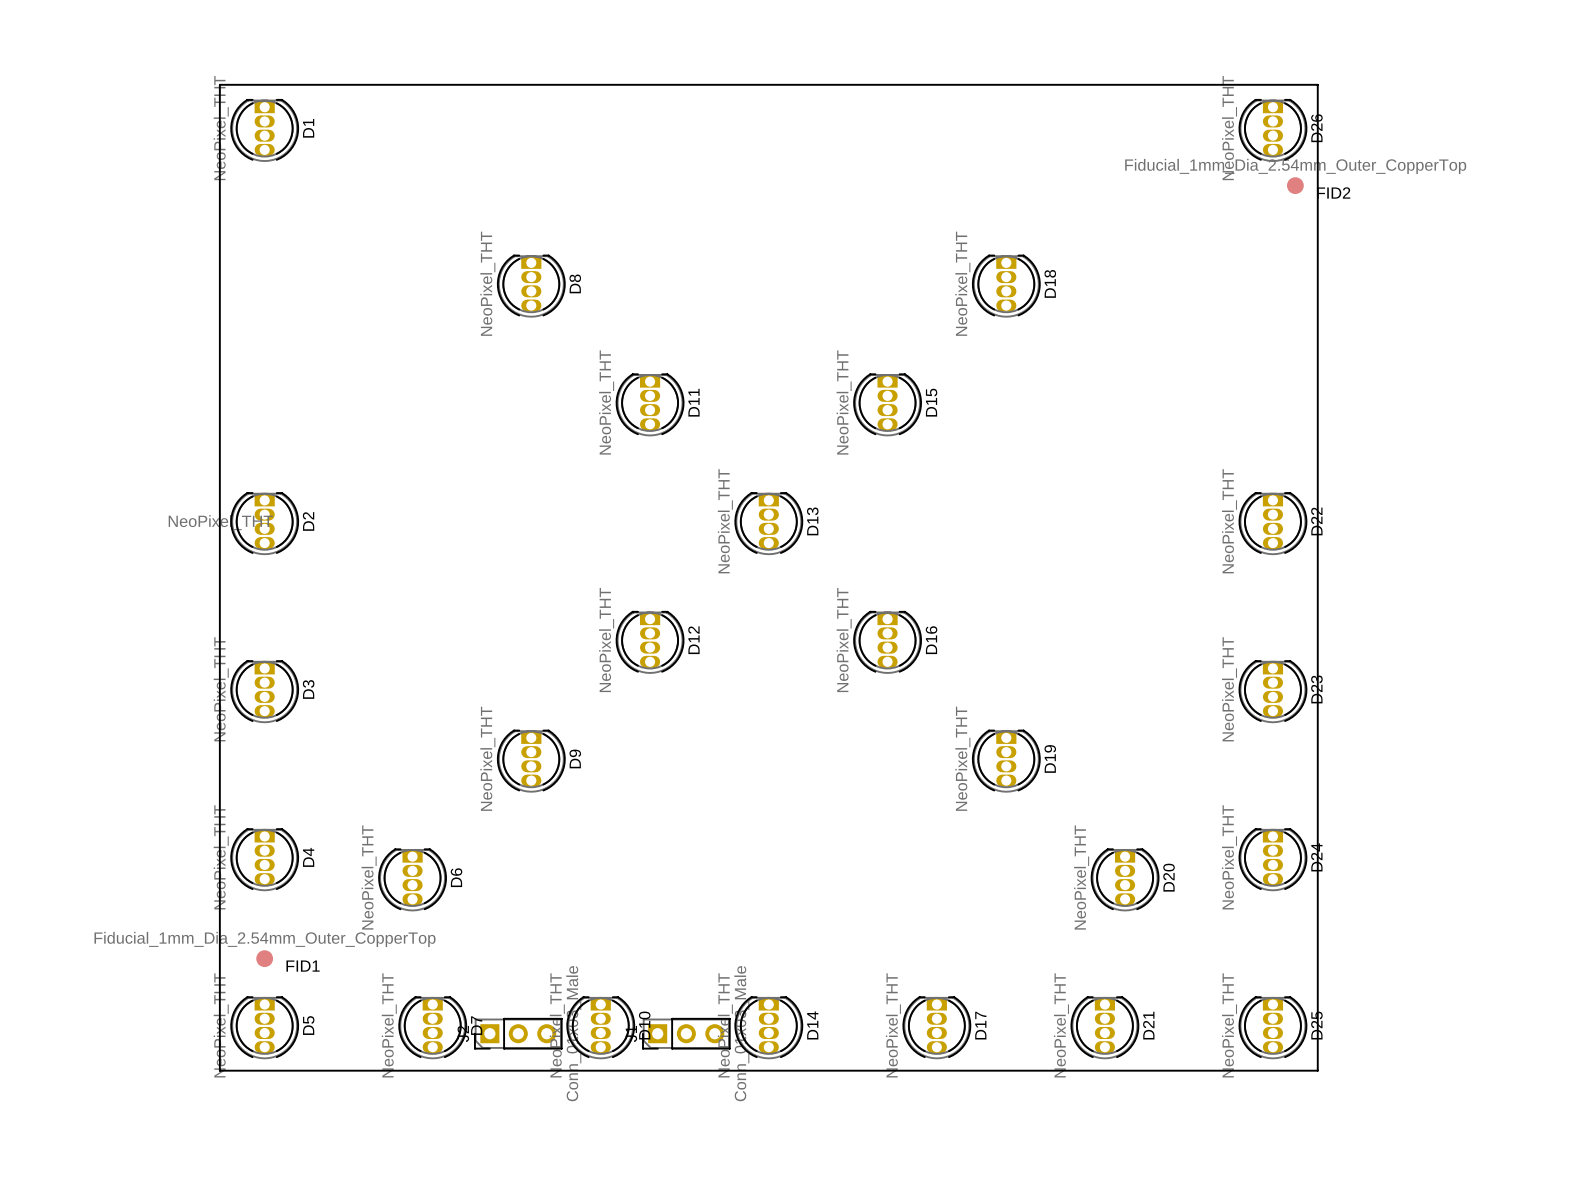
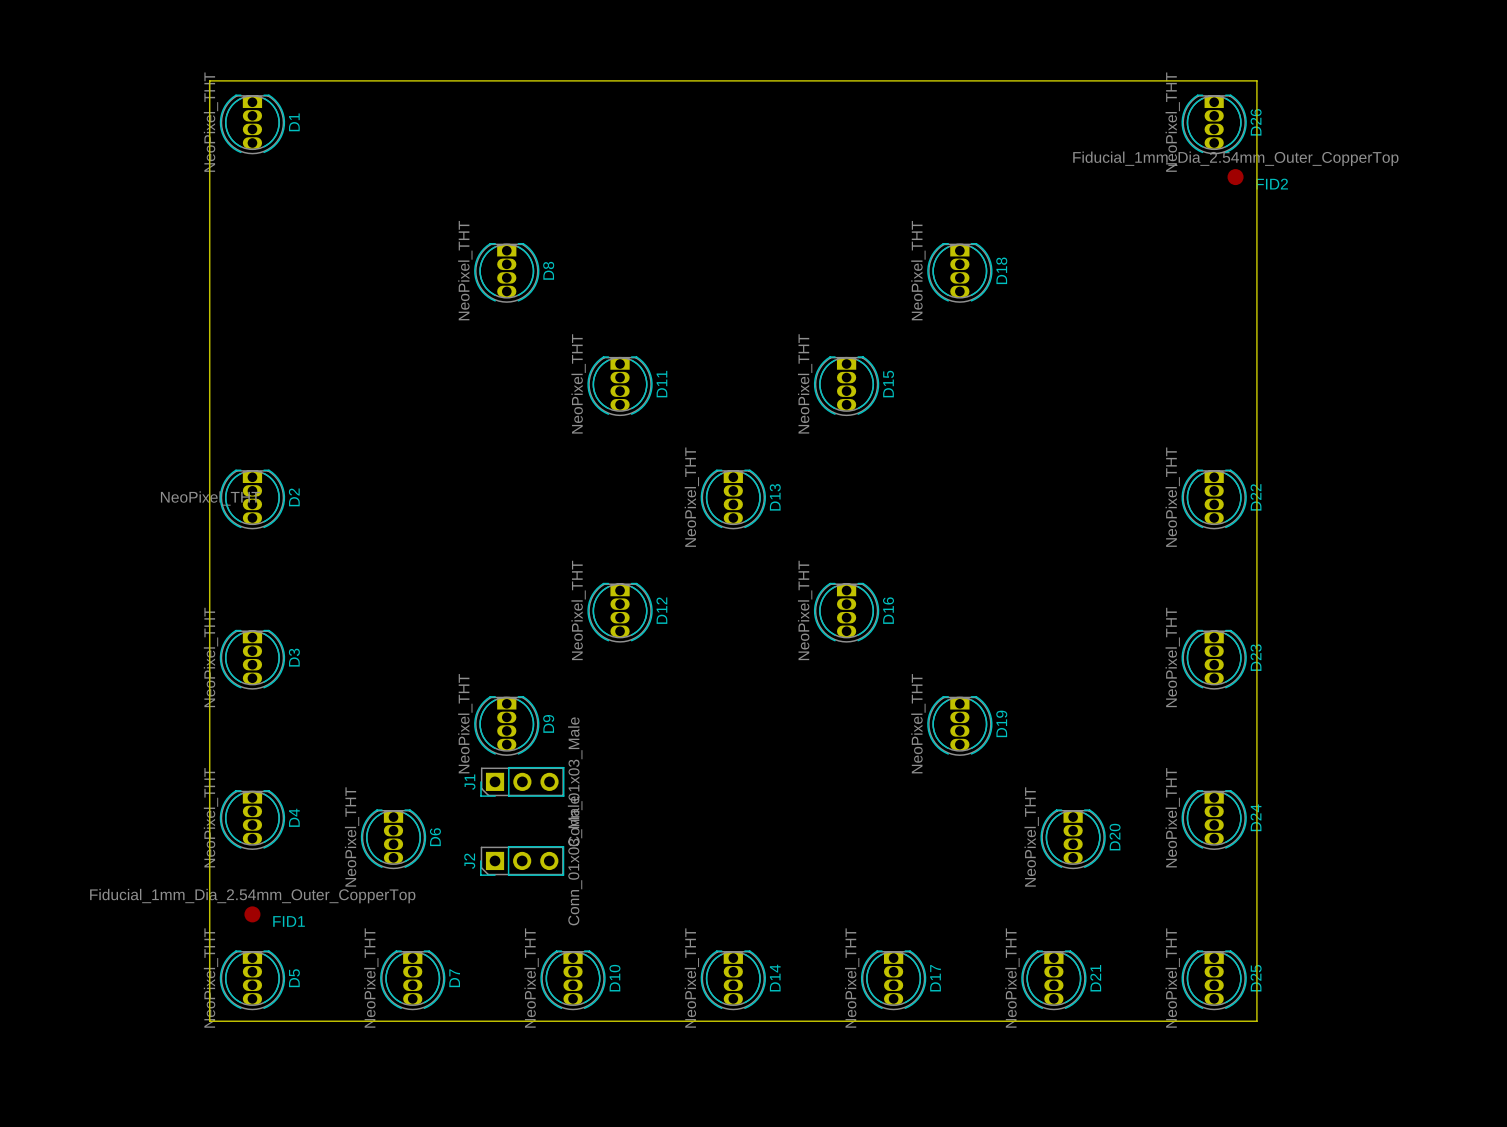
J2 position: (518, 1033) -> (522, 860)
J1 position: (686, 1033) -> (522, 781)

